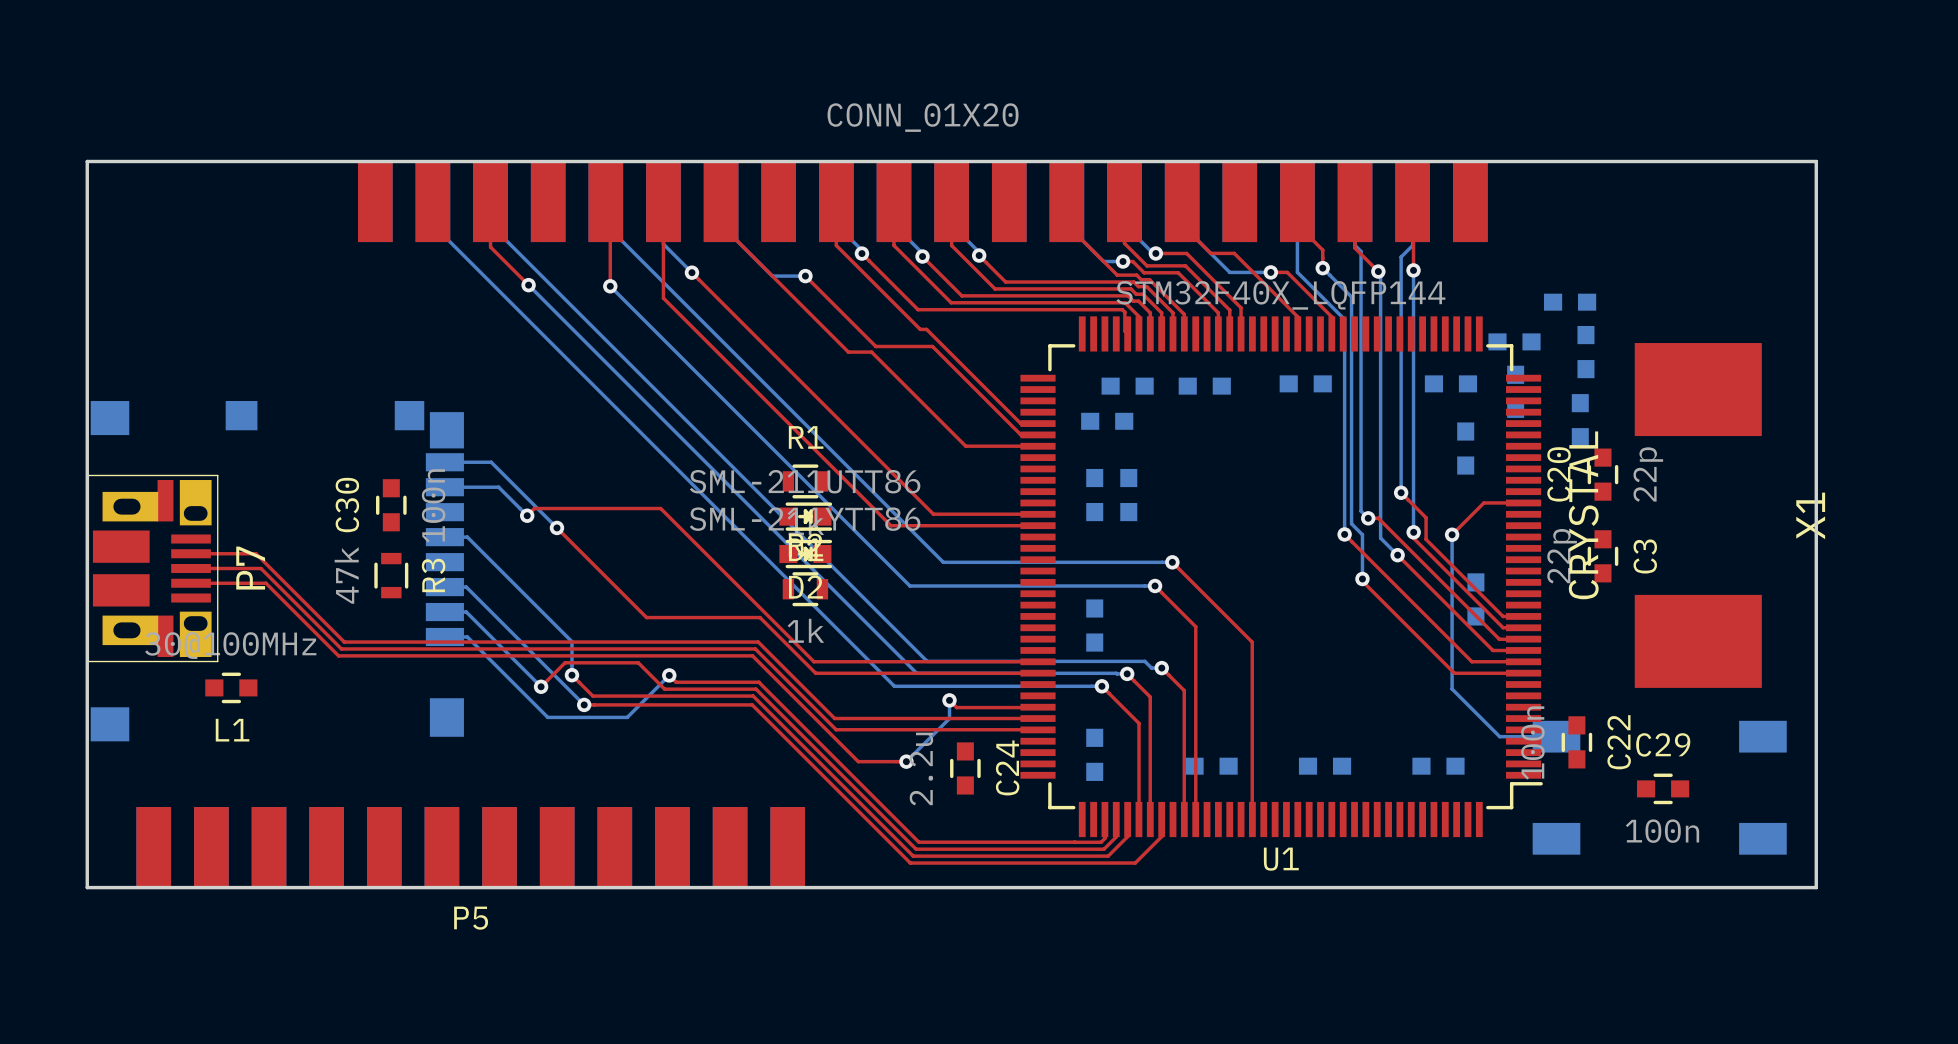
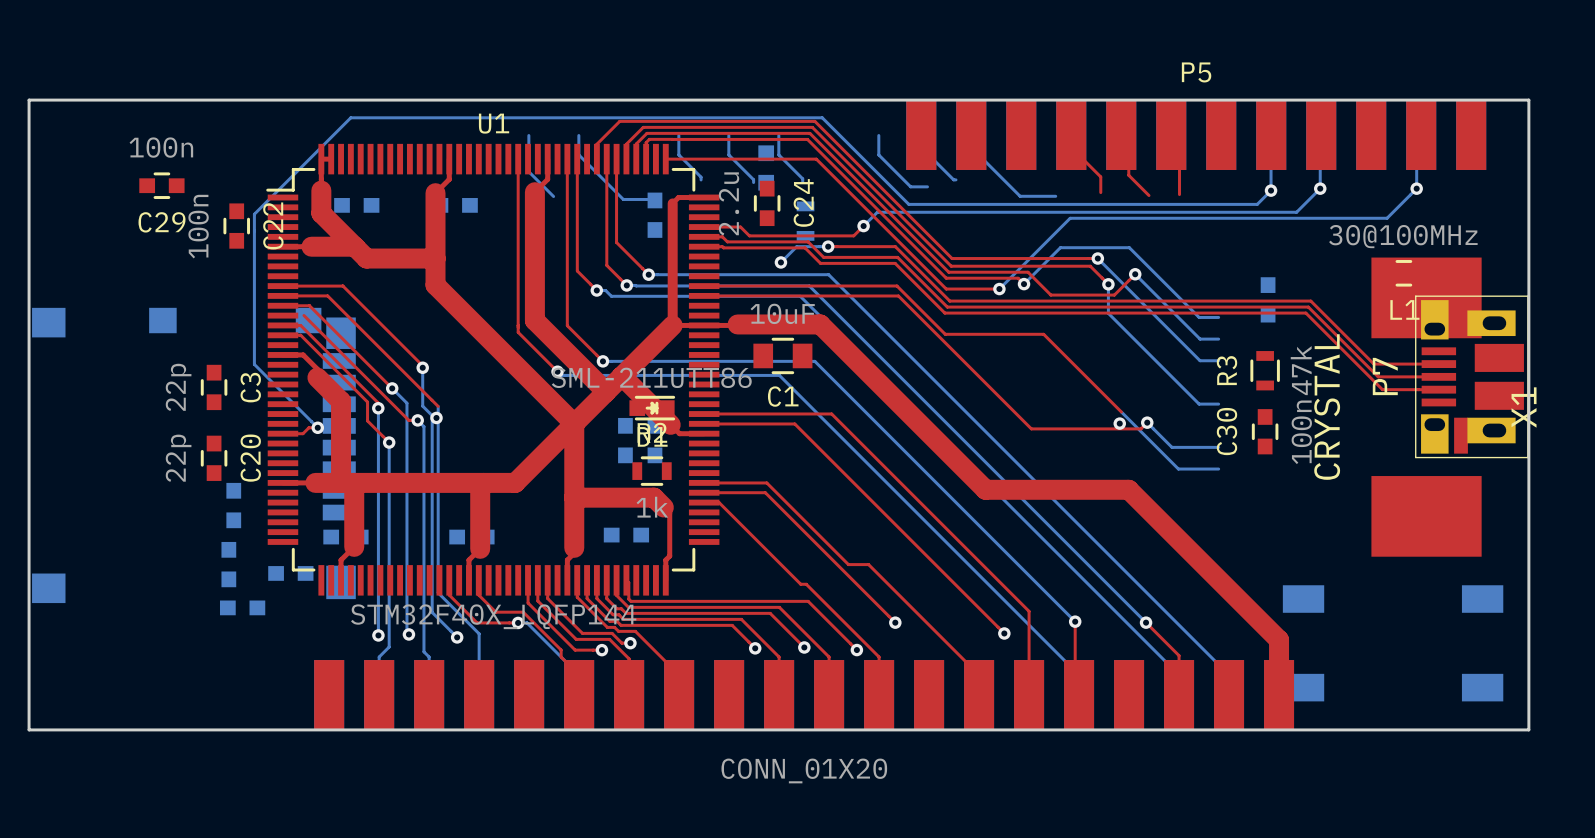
bottom track: (432, 202) (432, 224) (894, 686) (1101, 686) -> none
bottom track: (490, 202) (490, 224) (927, 661) (1144, 661) (1151, 668) (1161, 668) -> none
top track: (490, 202) (490, 247) (528, 285) -> none
bottom track: (605, 202) (605, 224) (943, 562) (1172, 562) -> none
top track: (605, 202) (610, 206) (610, 286) -> none
top track: (663, 202) (663, 298) (890, 525) (1039, 525) -> none
top track: (721, 202) (721, 224) (848, 352) (871, 352) (965, 446) (1039, 446) -> none
top track: (836, 202) (836, 245) (920, 329) (926, 329) (1020, 423) (1039, 423) -> none
top track: (893, 202) (893, 245) (951, 302) (1125, 302) (1138, 316) (1138, 333) -> none
part: CONN_01X20 (922, 202) -> none
top track: (951, 202) (951, 245) (995, 288) (1130, 288) (1136, 294) (1142, 294) (1161, 312) (1161, 333) -> none
top track: (1066, 202) (1066, 224) (1117, 275) (1136, 275) (1141, 279) (1149, 279) (1184, 314) (1184, 333) -> none
top track: (1124, 202) (1124, 243) (1147, 265) (1185, 265) (1229, 310) (1229, 335) -> none
top track: (1182, 202) (1182, 224) (1210, 253) (1234, 253) (1297, 316) (1297, 335) -> none
bottom track: (1297, 202) (1297, 272) (1344, 319) (1344, 534) -> none
bottom track: (1355, 202) (1355, 245) (1361, 251) (1361, 511) (1368, 518) -> none
bottom track: (1412, 202) (1412, 245) (1401, 257) (1401, 492) -> none
bottom track: none -> (1271, 135) (1271, 190) (1257, 204) (908, 204) (822, 117) (350, 117) (254, 214) (254, 364) (317, 427)
bottom track: none -> (1320, 136) (1320, 188) (1296, 212) (877, 212) (863, 226)
bottom track: none -> (1416, 140) (1416, 188) (1387, 218) (1070, 218) (999, 289)
top track: none -> (331, 159) (321, 159) (321, 213) (366, 258) (435, 258)
top track: none -> (449, 159) (449, 179) (435, 193) (435, 285) (574, 423) (574, 553) (567, 560) (567, 580)
top track: none -> (518, 159) (518, 332) (557, 371)
top track: none -> (547, 159) (547, 179) (534, 192) (534, 320) (605, 392)
top track: none -> (646, 159) (646, 142) (649, 139) (807, 139) (946, 278) (1018, 278) (1024, 284)
top track: none -> (665, 159) (816, 159) (946, 289) (999, 289)
top track: none -> (567, 160) (567, 325) (602, 361)
top track: none -> (577, 160) (577, 270) (596, 290)
top track: none -> (596, 160) (596, 144) (619, 121) (814, 121) (952, 258) (1097, 258)
top track: none -> (606, 160) (606, 265) (626, 285)
top track: none -> (616, 160) (616, 242) (648, 274)
top track: none -> (626, 160) (626, 144) (643, 127) (812, 127) (951, 266) (1090, 266) (1108, 284)
top track: none -> (636, 160) (636, 143) (646, 133) (809, 133) (948, 272) (1028, 272) (1050, 295) (1114, 295) (1135, 274)
top track: (861, 253) (918, 309) (1122, 309) (1124, 312) (1124, 331) (1127, 333) -> none
via: (861, 253) -> none
top track: (1155, 253) (1186, 253) (1241, 307) (1241, 335) -> none
via: (1155, 253) -> none
top track: (979, 255) (1005, 282) (1133, 282) (1138, 286) (1146, 286) (1173, 312) (1173, 333) -> none
via: (979, 255) -> none
top track: (922, 256) (961, 295) (1128, 295) (1133, 301) (1138, 301) (1150, 312) (1150, 333) -> none
via: (922, 256) -> none
top track: (1123, 261) (1132, 261) (1144, 272) (1178, 272) (1218, 312) (1218, 333) -> none
via: (1123, 261) -> none
via: none -> (1320, 188)
via: none -> (1416, 188)
via: none -> (1271, 190)
bottom track: (1322, 268) (1351, 296) (1351, 523) (1362, 534) (1362, 579) -> none
via: (1322, 268) -> none
bottom track: (1413, 270) (1413, 532) -> none
via: (1413, 270) -> none
bottom track: (1378, 271) (1380, 273) (1380, 538) (1397, 555) -> none
via: (1378, 271) -> none
top track: (691, 272) (933, 514) (1039, 514) -> none
via: (691, 272) -> none
top track: (1270, 272) (1287, 272) (1331, 316) (1331, 335) -> none
via: (1270, 272) -> none
top track: none -> (704, 197) (678, 197) (672, 203) (672, 325)
top track: (805, 276) (875, 346) (932, 346) (1020, 434) (1039, 434) -> none
via: (805, 276) -> none
part: none -> (356, 205)
part: none -> (455, 205)
bottom track: (528, 285) (916, 673) (1127, 673) -> none
via: (528, 285) -> none
bottom track: (610, 286) (909, 586) (1155, 586) -> none
via: (610, 286) -> none
part: none -> (654, 215)
part: (1570, 302) -> none
top track: none -> (863, 226) (853, 235) (749, 235) (740, 227) (704, 227)
via: none -> (863, 226)
top track: none -> (704, 236) (722, 236) (727, 241) (808, 241) (823, 257) (897, 257) (947, 307) (1308, 307) (1378, 376) (1438, 376)
top track: none -> (282, 246) (354, 246)
top track: none -> (704, 246) (805, 247) (820, 263) (895, 263) (944, 313) (1305, 313) (1382, 389) (1438, 389)
bottom track: none -> (828, 246) (796, 246) (780, 262)
top track: none -> (828, 246) (895, 246) (949, 301) (1310, 301) (1373, 364) (1438, 364)
via: none -> (828, 246)
part: (1514, 341) -> none
bottom track: none -> (1097, 258) (1200, 360) (1218, 360)
via: none -> (1097, 258)
via: none -> (780, 262)
part: (1585, 352) -> none
bottom track: none -> (648, 274) (828, 274) (1229, 675) (1229, 694)
via: none -> (648, 274)
bottom track: none -> (1135, 274) (1200, 339) (1218, 339)
via: none -> (1135, 274)
bottom track: none -> (1024, 284) (1060, 247) (1129, 247) (1199, 317) (1218, 317)
via: none -> (1024, 284)
bottom track: none -> (1108, 284) (1108, 313) (1199, 404) (1218, 404)
via: none -> (1108, 284)
top track: none -> (282, 286) (342, 286)
top track: none -> (342, 285) (422, 367)
bottom track: none -> (626, 285) (809, 285) (1146, 622)
via: none -> (626, 285)
top track: none -> (702, 285) (896, 285) (945, 334) (1043, 334) (1121, 412)
via: none -> (999, 289)
bottom track: none -> (596, 290) (605, 290) (611, 296) (800, 296) (1179, 675) (1179, 694)
via: none -> (596, 290)
part: (1305, 383) -> none
part: (1450, 383) -> none
part: (1127, 386) -> none
part: (1204, 386) -> none
top track: none -> (282, 295) (327, 295) (438, 406)
top track: none -> (702, 295) (898, 295) (1031, 428) (1141, 428) (1147, 422)
top track: none -> (282, 305) (309, 305) (392, 388)
top track: none -> (303, 315) (408, 420) (417, 420)
part: (1580, 420) -> none
top track: none -> (282, 325) (300, 325) (378, 403) (378, 408)
top track: none -> (672, 325) (820, 324) (985, 489) (1128, 489) (1279, 640) (1279, 694)
top track: none -> (672, 325) (515, 482) (282, 482)
part: (1107, 421) -> none
top track: none -> (282, 335) (300, 335) (367, 402) (367, 420) (389, 442)
part: (1465, 448) -> none
top track: none -> (282, 354) (303, 354) (317, 369) (317, 377) (341, 401) (341, 482)
C1: none -> 10uF (782, 355)
bottom track: (444, 462) (491, 462) (556, 527) -> none
bottom track: none -> (602, 361) (814, 361) (1075, 621)
via: none -> (602, 361)
bottom track: none -> (422, 367) (422, 406) (432, 415) (432, 612) (457, 637)
via: none -> (422, 367)
bottom track: none -> (557, 371) (561, 375) (779, 375) (1079, 675) (1079, 694)
via: none -> (557, 371)
C20 name position: C20 (1559, 474) -> C20 (250, 458)
C20 position: (1602, 474) -> (214, 458)
C20 value position: 22p (1648, 474) -> 22p (178, 458)
top track: none -> (621, 376) (679, 433) (704, 433)
R1 side: top (805, 481) -> bottom (805, 221)
bottom track: (444, 487) (498, 487) (527, 515) -> none
top track: (1401, 492) (1426, 517) (1426, 539) (1503, 616) (1521, 616) -> none
via: (1401, 492) -> none
bottom track: none -> (392, 388) (406, 403) (406, 632) (408, 634)
via: none -> (392, 388)
part: (1094, 495) -> none
part: (1128, 495) -> none
top track: (1521, 502) (1483, 502) (1452, 534) -> none
C30 position: (391, 505) -> (1265, 431)
bottom track: none -> (438, 406) (438, 592) (479, 633) (479, 694)
top track: (527, 515) (534, 508) (660, 508) (813, 661) (1039, 661) -> none
via: (527, 515) -> none
via: none -> (378, 408)
bottom track: none -> (378, 408) (378, 635)
top track: (1368, 518) (1378, 518) (1499, 639) (1521, 639) -> none
via: (1368, 518) -> none
bottom track: none -> (1121, 412) (1178, 469) (1218, 469)
top track: none -> (702, 413) (831, 413) (1029, 611) (1029, 694)
top track: (556, 527) (646, 617) (760, 617) (815, 673) (1039, 673) -> none
bottom track: none -> (417, 420) (423, 426) (423, 651) (429, 657) (429, 694)
via: none -> (417, 420)
top track: (1413, 532) (1413, 538) (1503, 627) (1521, 627) -> none
via: (1413, 532) -> none
bottom track: none -> (1147, 422) (1171, 447) (1218, 447)
via: none -> (1147, 422)
top track: none -> (702, 423) (794, 423) (1004, 633)
top track: (1344, 534) (1471, 661) (1521, 661) -> none
bottom track: (1452, 534) (1452, 689) (1499, 736) (1556, 736) -> none
via: (1452, 534) -> none
bottom track: (444, 537) (467, 537) (571, 641) (571, 675) -> none
top track: none -> (317, 427) (308, 427) (302, 433) (284, 433)
via: none -> (317, 427)
top track: (191, 553) (256, 553) (344, 642) (758, 642) (834, 718) (1039, 718) -> none
part: none -> (625, 440)
D2 side: top (805, 554) -> bottom (766, 167)
part: none -> (654, 440)
top track: (1397, 555) (1492, 650) (1521, 650) -> none
via: (1397, 555) -> none
bottom track: none -> (389, 442) (389, 647) (379, 657) (379, 694)
via: none -> (389, 442)
C3 position: (1602, 556) -> (214, 387)
top track: (1172, 562) (1252, 642) (1252, 817) -> none
via: (1172, 562) -> none
P7 rotation: 0° (153, 568) -> 180° (1471, 376)
P7 position: (153, 568) -> (1471, 376)
top track: (191, 568) (260, 568) (341, 648) (755, 648) (836, 729) (1039, 729) -> none
R3 value position: 47k (346, 575) -> 47k (1301, 370)
R3 position: (391, 575) -> (1265, 370)
R3 name position: R3 (433, 575) -> R3 (1227, 370)
U1 rotation: 0° (1281, 576) -> 180° (492, 369)
U1 position: (1281, 576) -> (492, 369)
top track: (1362, 579) (1362, 581) (1454, 673) (1521, 673) -> none
via: (1362, 579) -> none
top track: (191, 583) (265, 583) (338, 655) (752, 655) (858, 761) (906, 761) -> none
top track: (1155, 586) (1195, 626) (1195, 817) -> none
via: (1155, 586) -> none
bottom track: (444, 587) (466, 587) (584, 704) -> none
part: (1475, 599) -> none
top track: none -> (354, 482) (354, 546) (341, 560) (341, 580)
top track: none -> (483, 482) (480, 486) (480, 548) (468, 560) (468, 580)
top track: none -> (702, 482) (766, 482) (848, 564) (868, 564) (979, 675) (979, 694)
bottom track: (444, 612) (466, 612) (541, 686) -> none
top track: none -> (702, 492) (765, 492) (895, 622)
top track: none -> (574, 497) (653, 497) (669, 513) (669, 556) (665, 560) (665, 580)
top track: none -> (702, 502) (718, 502) (800, 584) (806, 584) (879, 657) (879, 694)
part: (1094, 625) -> none
part: none -> (233, 505)
bottom track: (444, 637) (467, 637) (547, 717) (627, 717) (669, 675) -> none
part: none -> (626, 535)
part: none -> (345, 537)
part: none -> (471, 537)
top track: (1161, 668) (1184, 690) (1184, 817) -> none
via: (1161, 668) -> none
top track: (1127, 673) (1150, 696) (1150, 817) -> none
via: (1127, 673) -> none
top track: (571, 675) (592, 696) (753, 696) (913, 856) (1108, 856) (1127, 836) (1127, 817) -> none
via: (571, 675) -> none
top track: (669, 675) (676, 682) (758, 682) (918, 842) (1101, 842) (1104, 838) (1104, 819) -> none
via: (669, 675) -> none
top track: (541, 686) (565, 662) (638, 662) (664, 689) (756, 689) (916, 849) (1104, 849) (1116, 836) (1116, 817) -> none
via: (541, 686) -> none
top track: (1101, 686) (1139, 723) (1139, 817) -> none
via: (1101, 686) -> none
L1 position: (231, 687) -> (1403, 273)
part: none -> (228, 564)
bottom track: (949, 700) (949, 718) (906, 761) -> none
top track: (949, 700) (956, 707) (1039, 707) -> none
via: (949, 700) -> none
top track: (584, 704) (752, 704) (910, 863) (1135, 863) (1161, 836) (1161, 817) -> none
via: (584, 704) -> none
part: none -> (290, 573)
top track: none -> (449, 578) (449, 595) (477, 622) (518, 622)
top track: none -> (478, 578) (478, 595) (495, 612) (523, 612) (561, 650) (561, 657) (579, 675) (579, 694)
top track: none -> (528, 578) (528, 603) (575, 650) (601, 650)
top track: none -> (537, 578) (537, 600) (576, 639) (609, 639) (629, 658) (629, 694)
top track: none -> (547, 580) (547, 598) (582, 633) (612, 633) (621, 643) (630, 643)
top track: none -> (577, 580) (577, 597) (607, 627) (614, 627) (618, 631) (635, 631) (679, 675) (679, 694)
top track: none -> (587, 580) (587, 598) (609, 621) (617, 621) (621, 625) (732, 625) (755, 648)
top track: none -> (596, 580) (596, 598) (613, 614) (618, 614) (623, 619) (741, 619) (779, 657) (779, 694)
top track: none -> (606, 580) (606, 598) (616, 608) (621, 608) (626, 613) (770, 613) (804, 647)
top track: none -> (616, 580) (616, 595) (628, 607) (779, 607) (829, 657) (829, 694)
top track: none -> (626, 580) (628, 582) (628, 599) (630, 601) (808, 601) (856, 650)
C22 position: (1576, 742) -> (236, 226)
C29 name position: C29 (1663, 744) -> C29 (162, 222)
part: none -> (242, 607)
part: (1094, 754) -> none
via position: (906, 761) -> (755, 648)
top track: none -> (1075, 621) (1075, 690) (1079, 694)
via: none -> (1075, 621)
via: none -> (895, 622)
top track: none -> (1146, 622) (1179, 655) (1179, 694)
via: none -> (1146, 622)
bottom track: none -> (518, 622) (527, 622) (579, 675) (579, 694)
via: none -> (518, 622)
part: (1211, 766) -> none
part: (1325, 766) -> none
part: (1438, 766) -> none
C24 position: (965, 768) -> (767, 203)
via: none -> (1004, 633)
via: none -> (408, 634)
via: none -> (378, 635)
via: none -> (457, 637)
via: none -> (630, 643)
C29 position: (1663, 788) -> (161, 185)
via: none -> (804, 647)
via: none -> (601, 650)
via: none -> (856, 650)
C29 value position: 100n (1662, 831) -> 100n (161, 147)
P5 position: (470, 846) -> (1196, 135)
part: none -> CONN_01X20 (804, 694)
P5 name position: P5 (471, 918) -> P5 (1196, 72)

